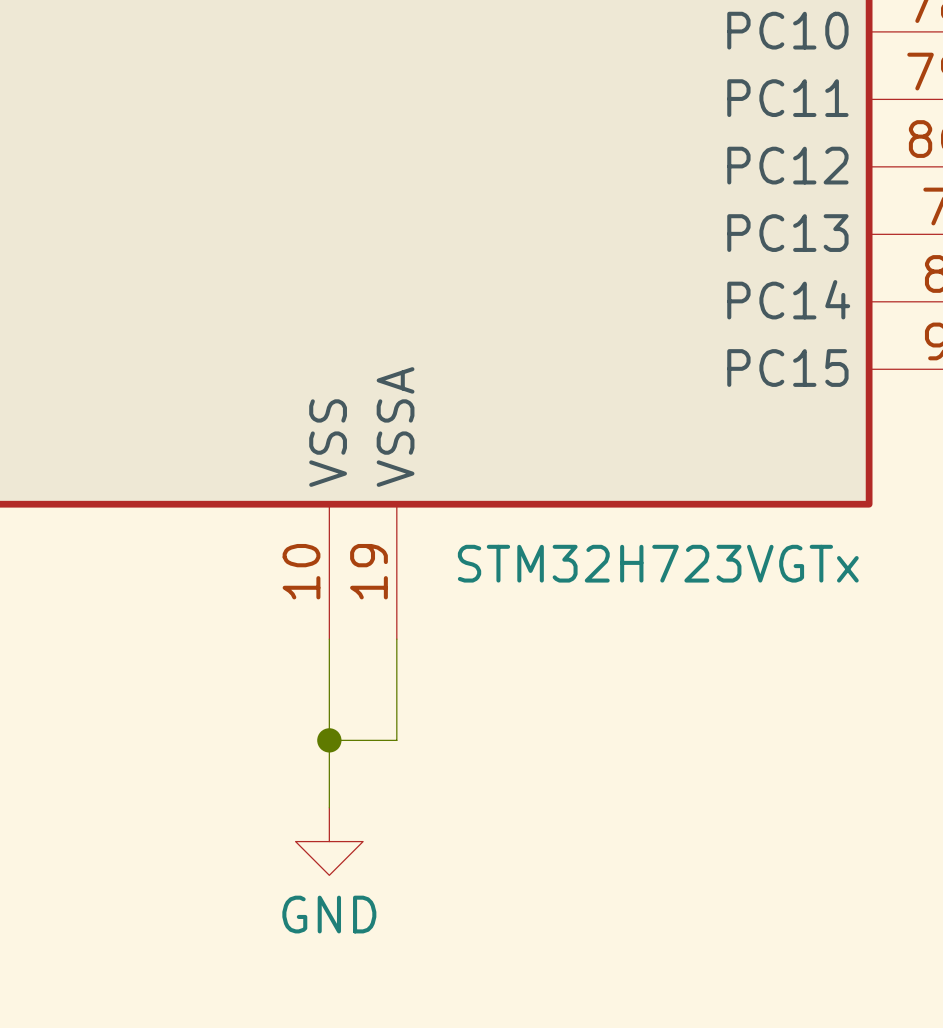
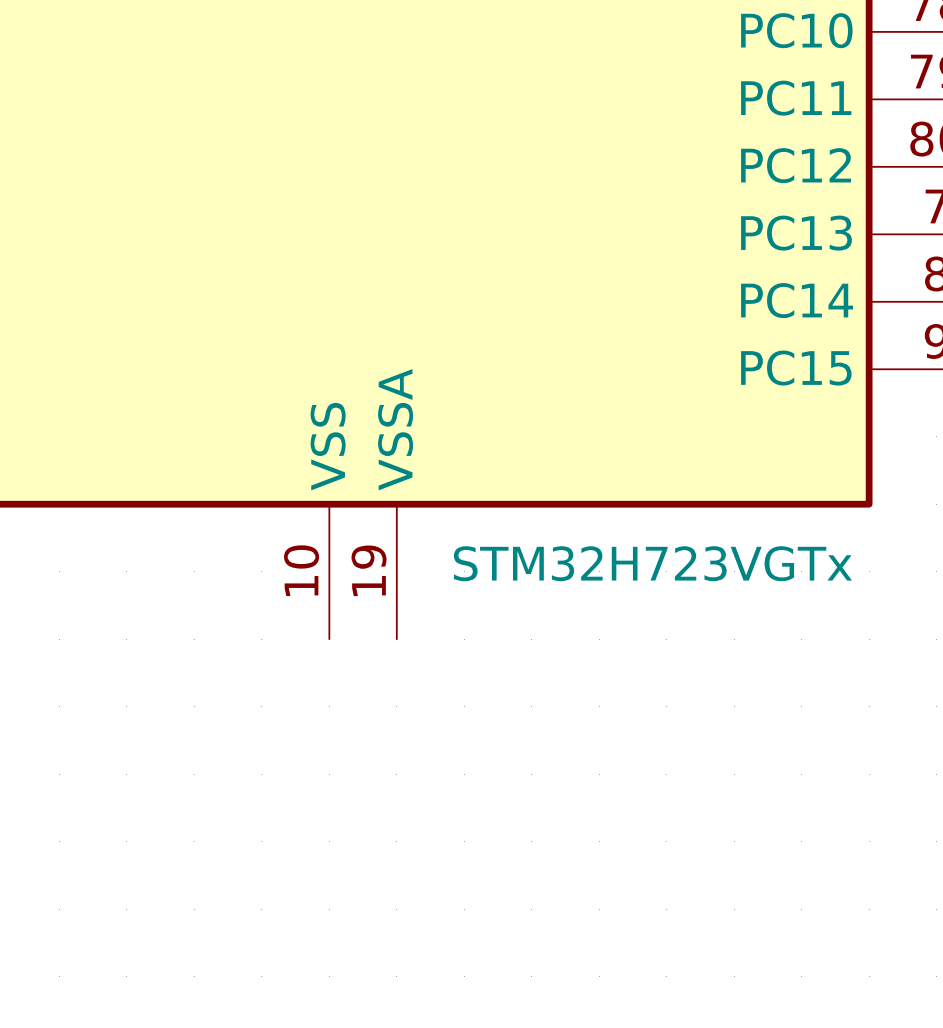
wire: (329, 639) (329, 807) -> none
wire: (396, 639) (396, 740) (329, 740) -> none
junction: (329, 740) -> none
power symbol: GND (329, 841) -> none

